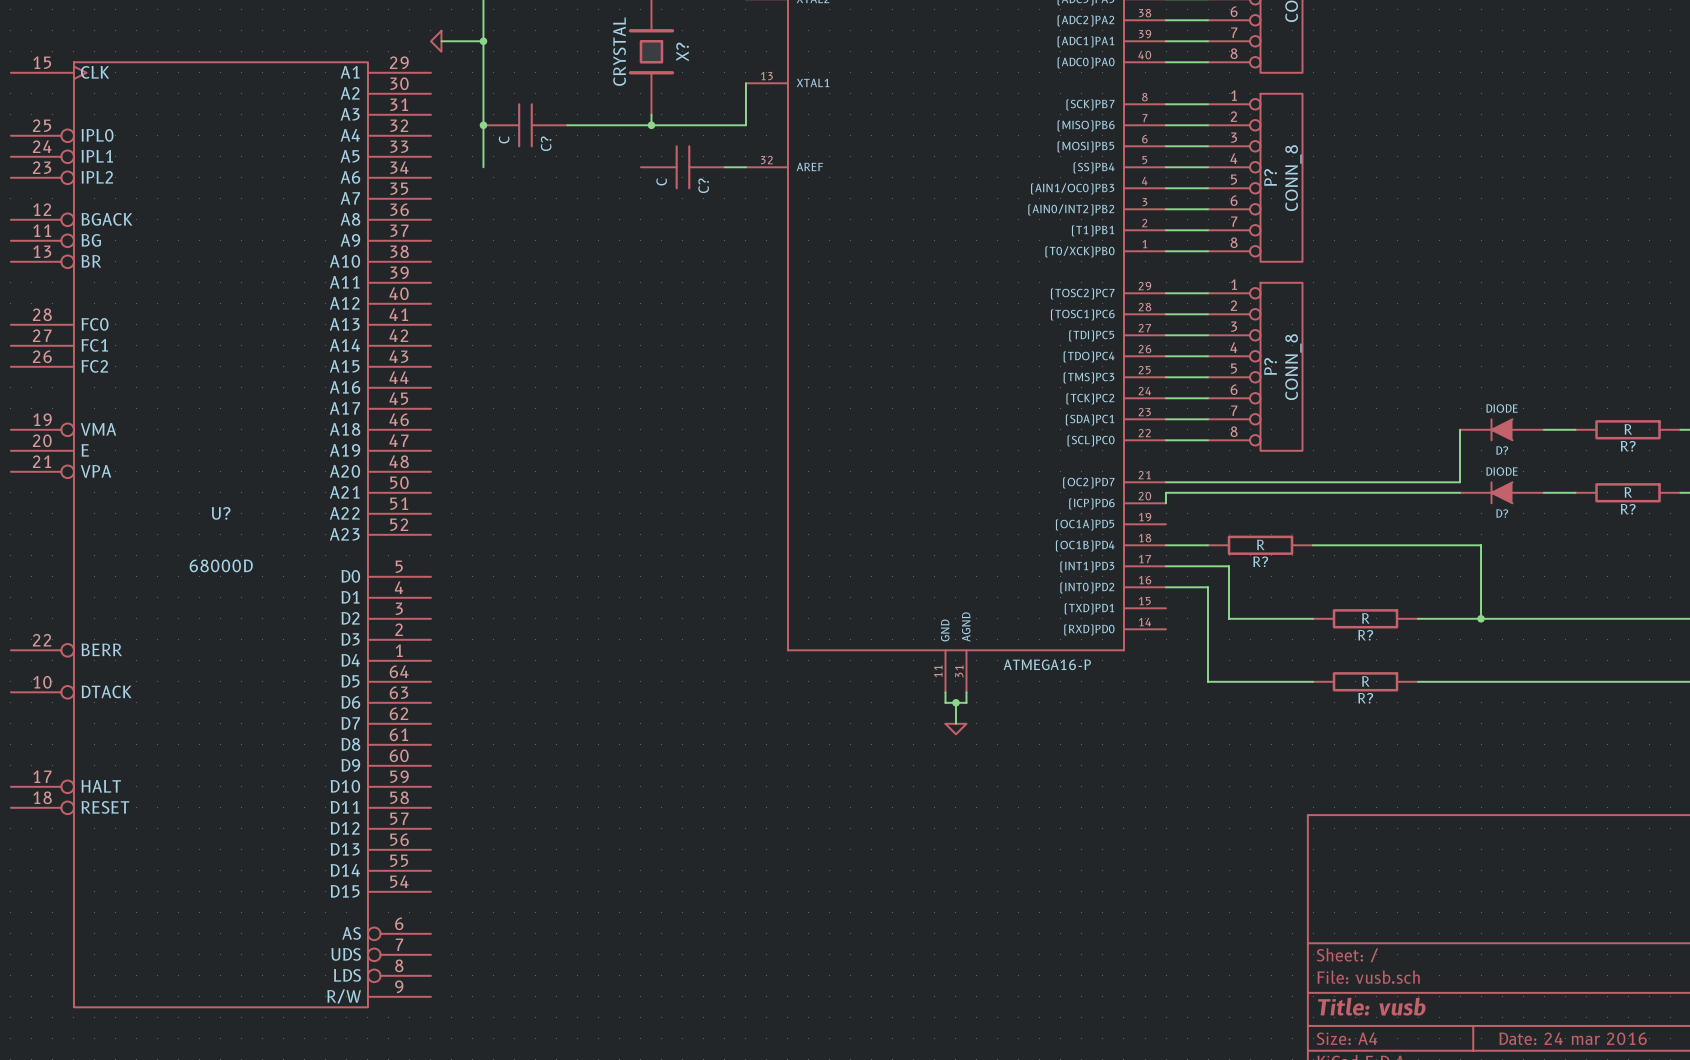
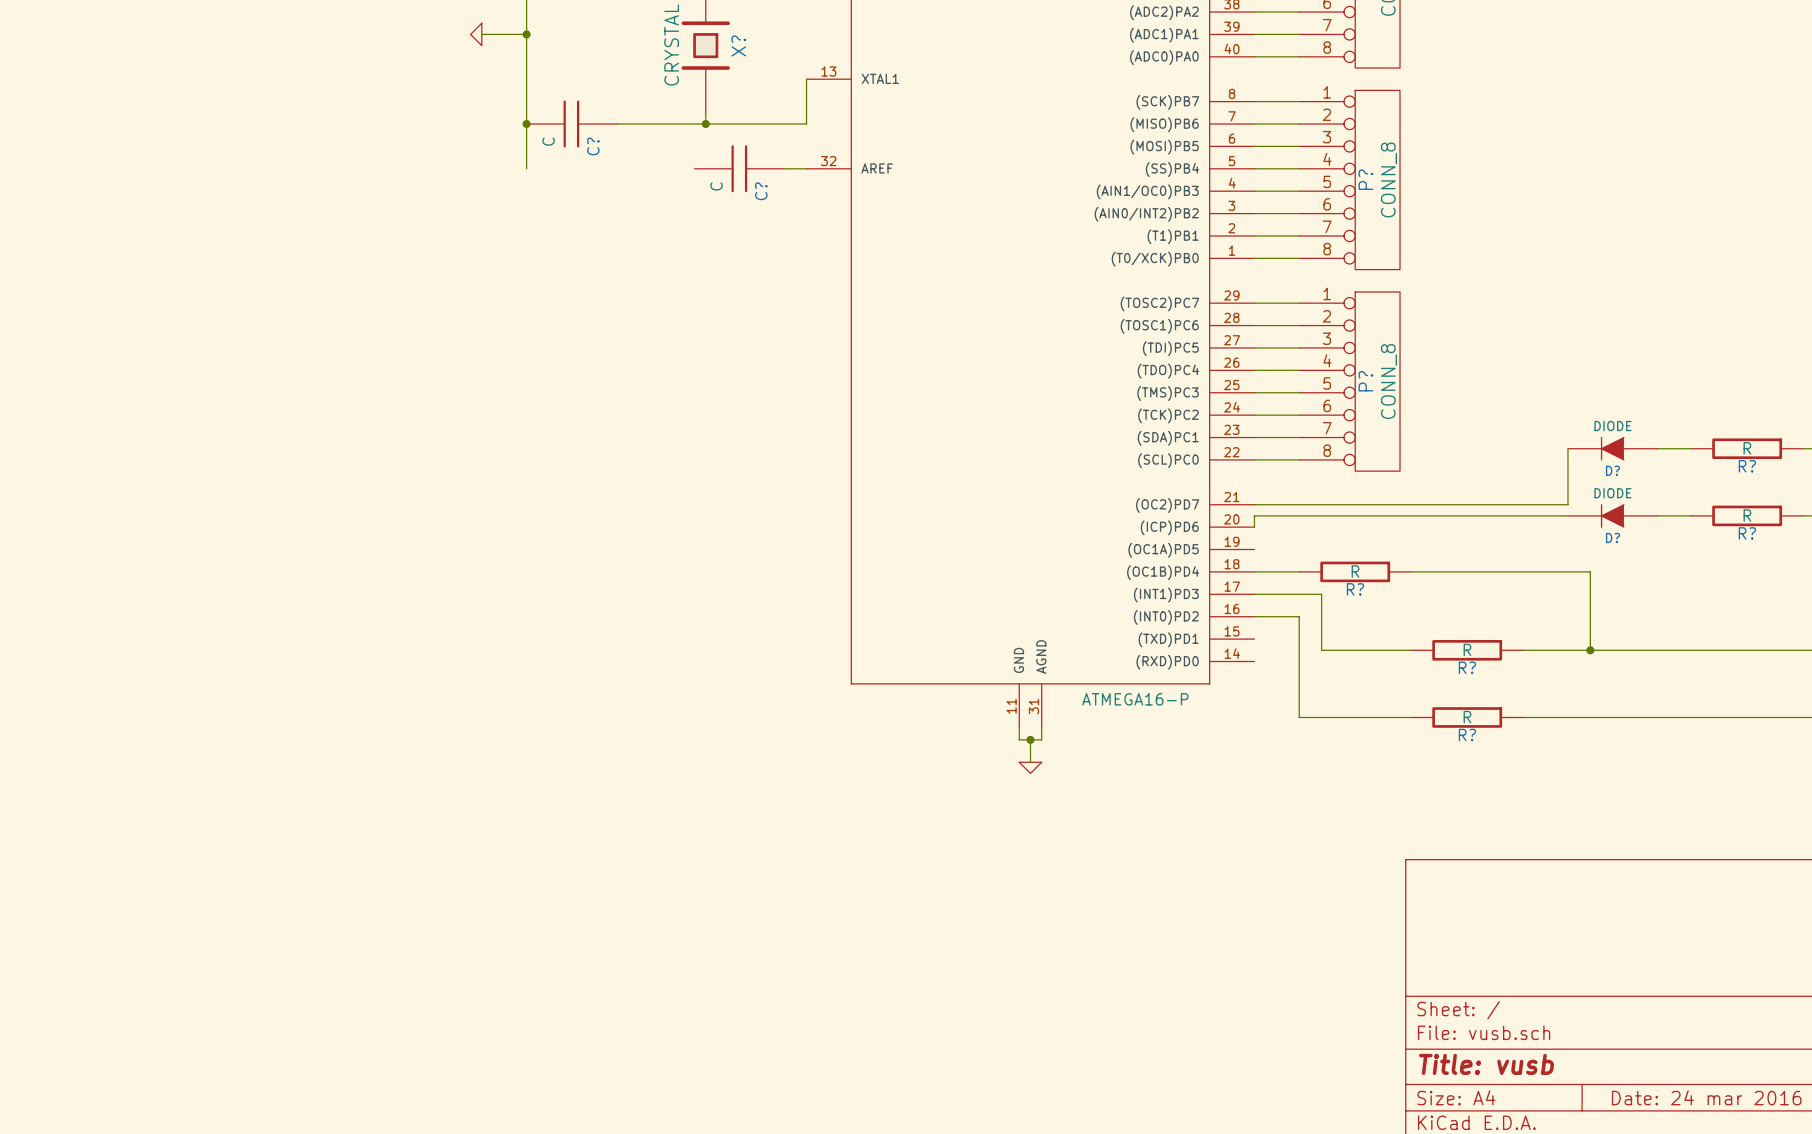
U?: 68000D (220, 534) -> none

